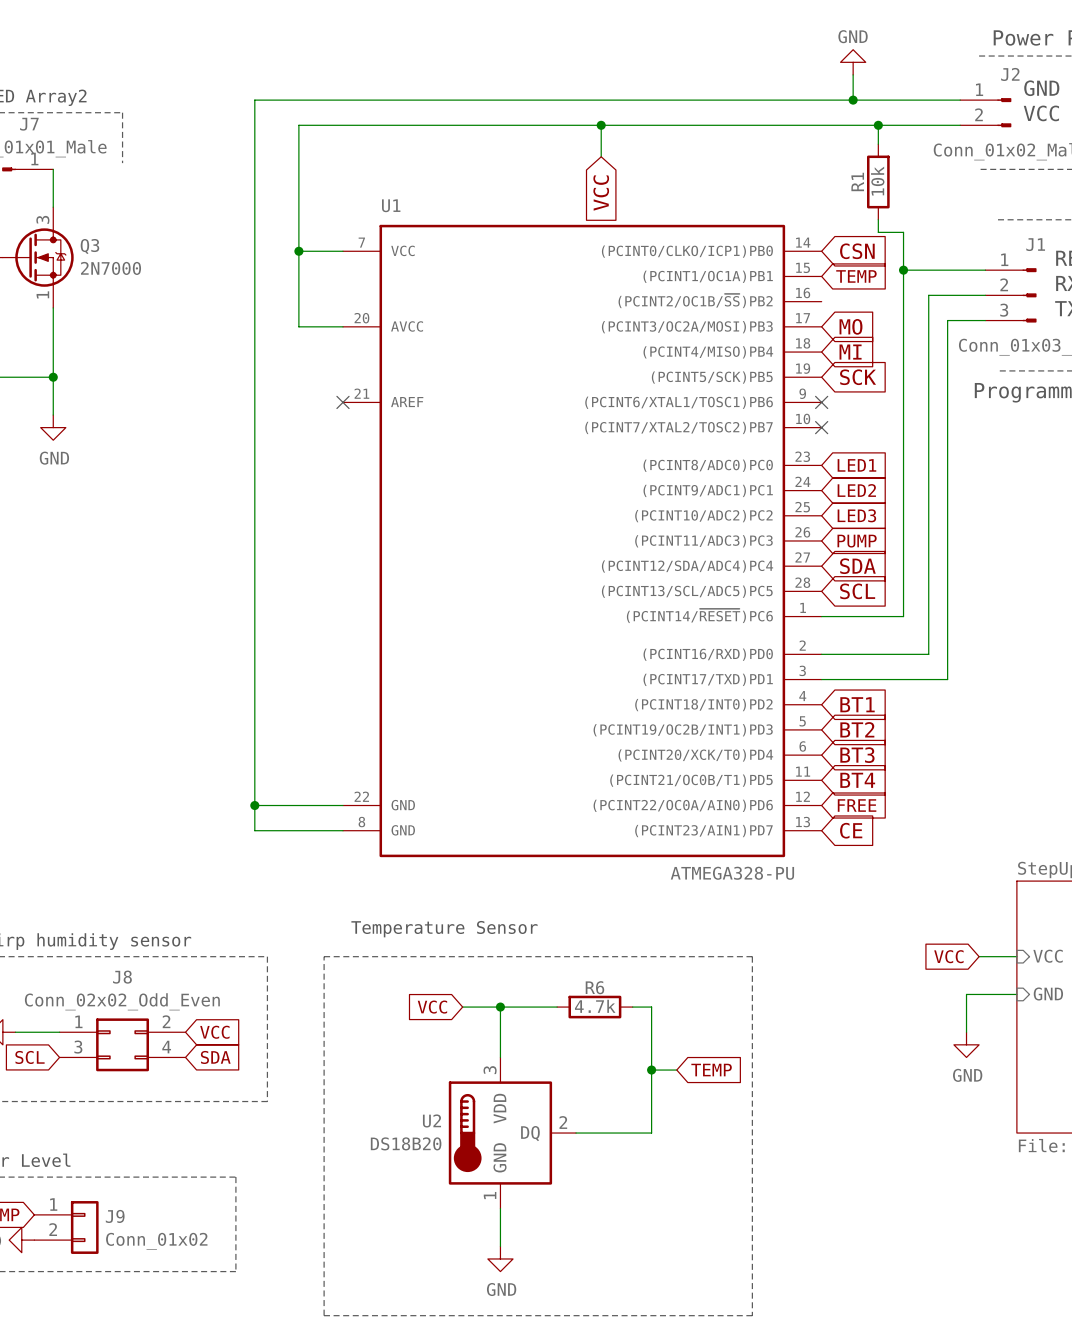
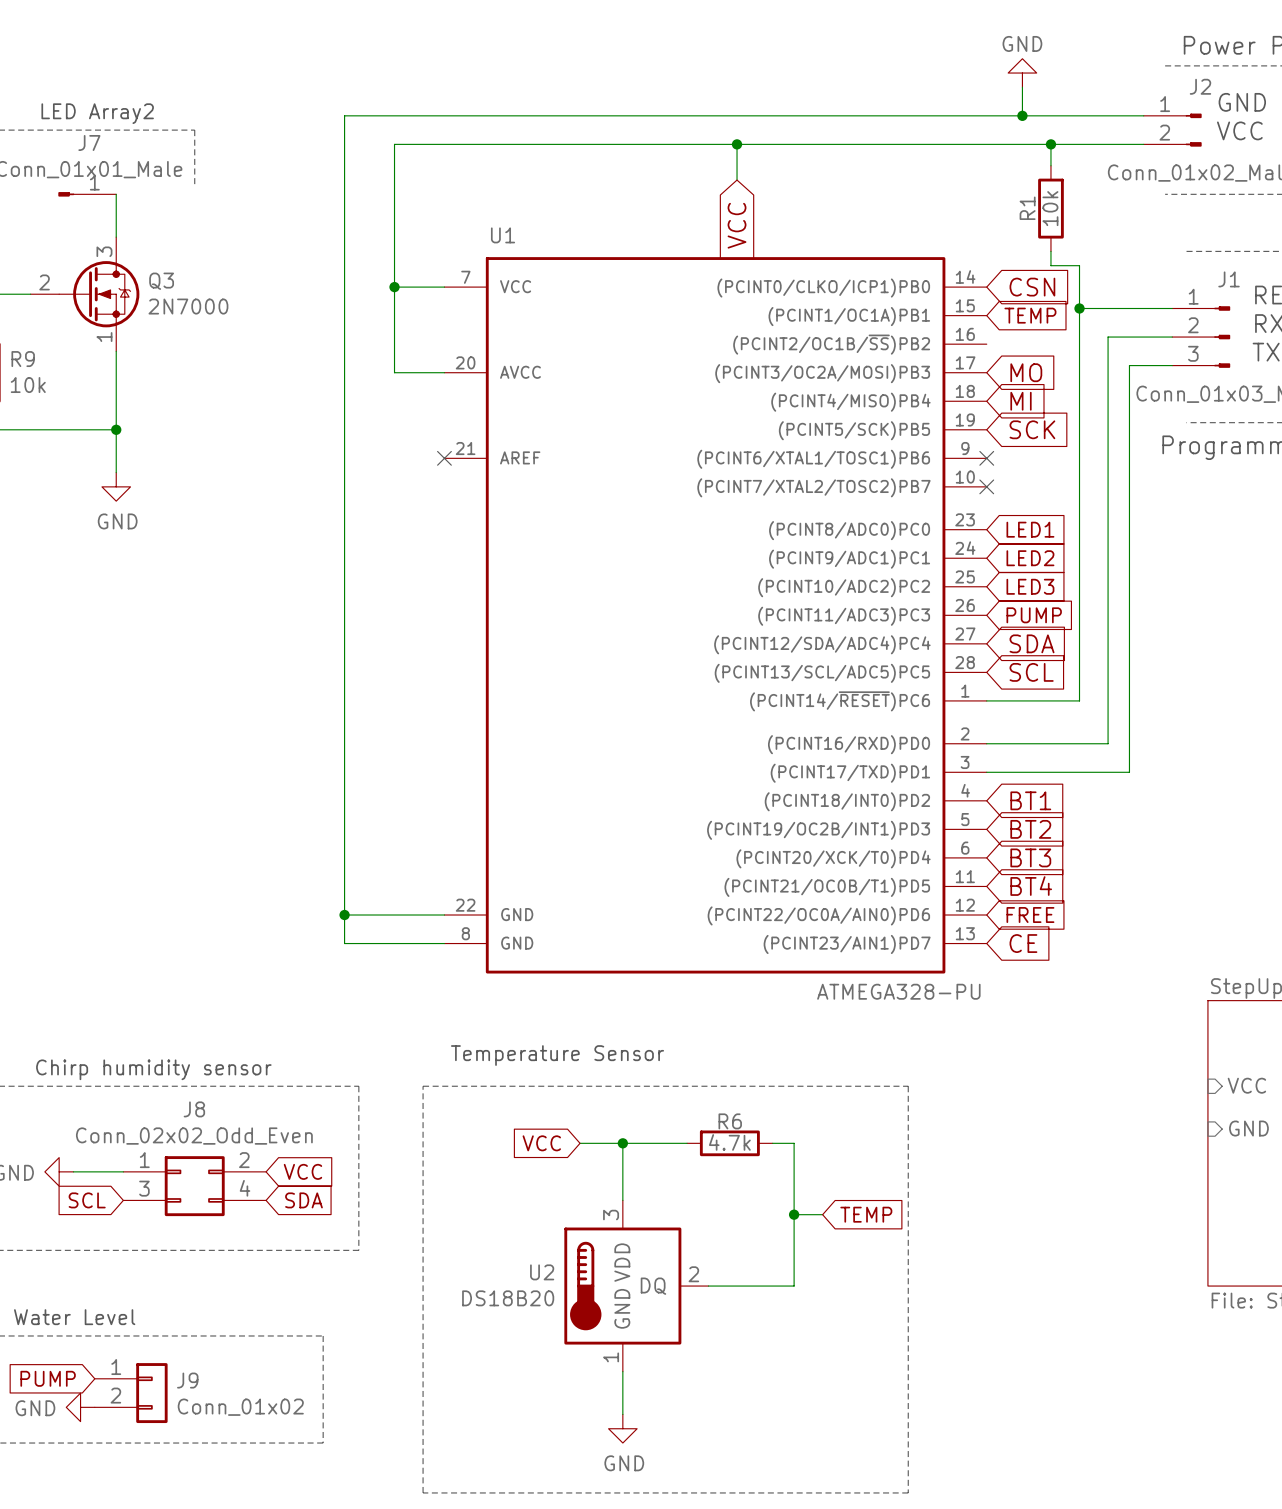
global label: VCC (948, 956) -> none
wire: (979, 956) (1016, 956) -> none
wire: (1016, 994) (966, 994) (966, 1032) -> none
power symbol: GND (966, 1044) -> none

